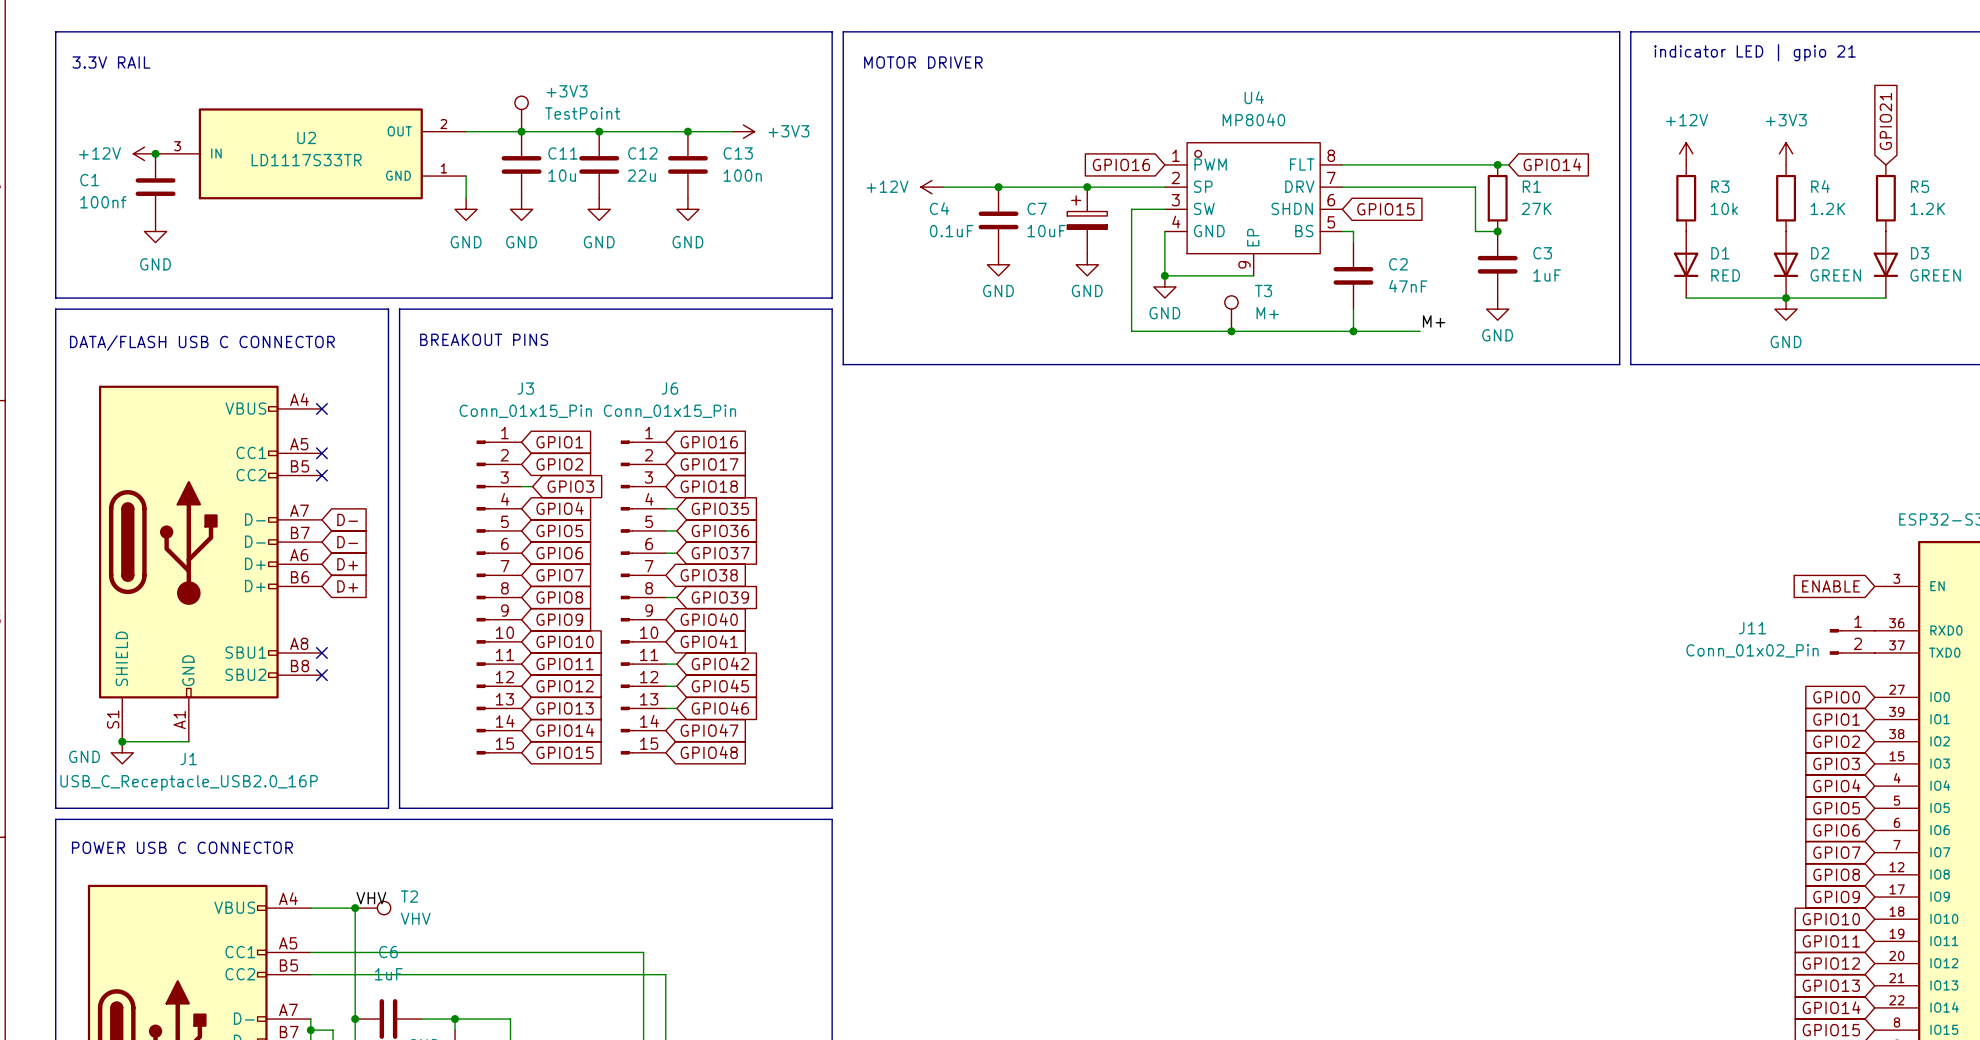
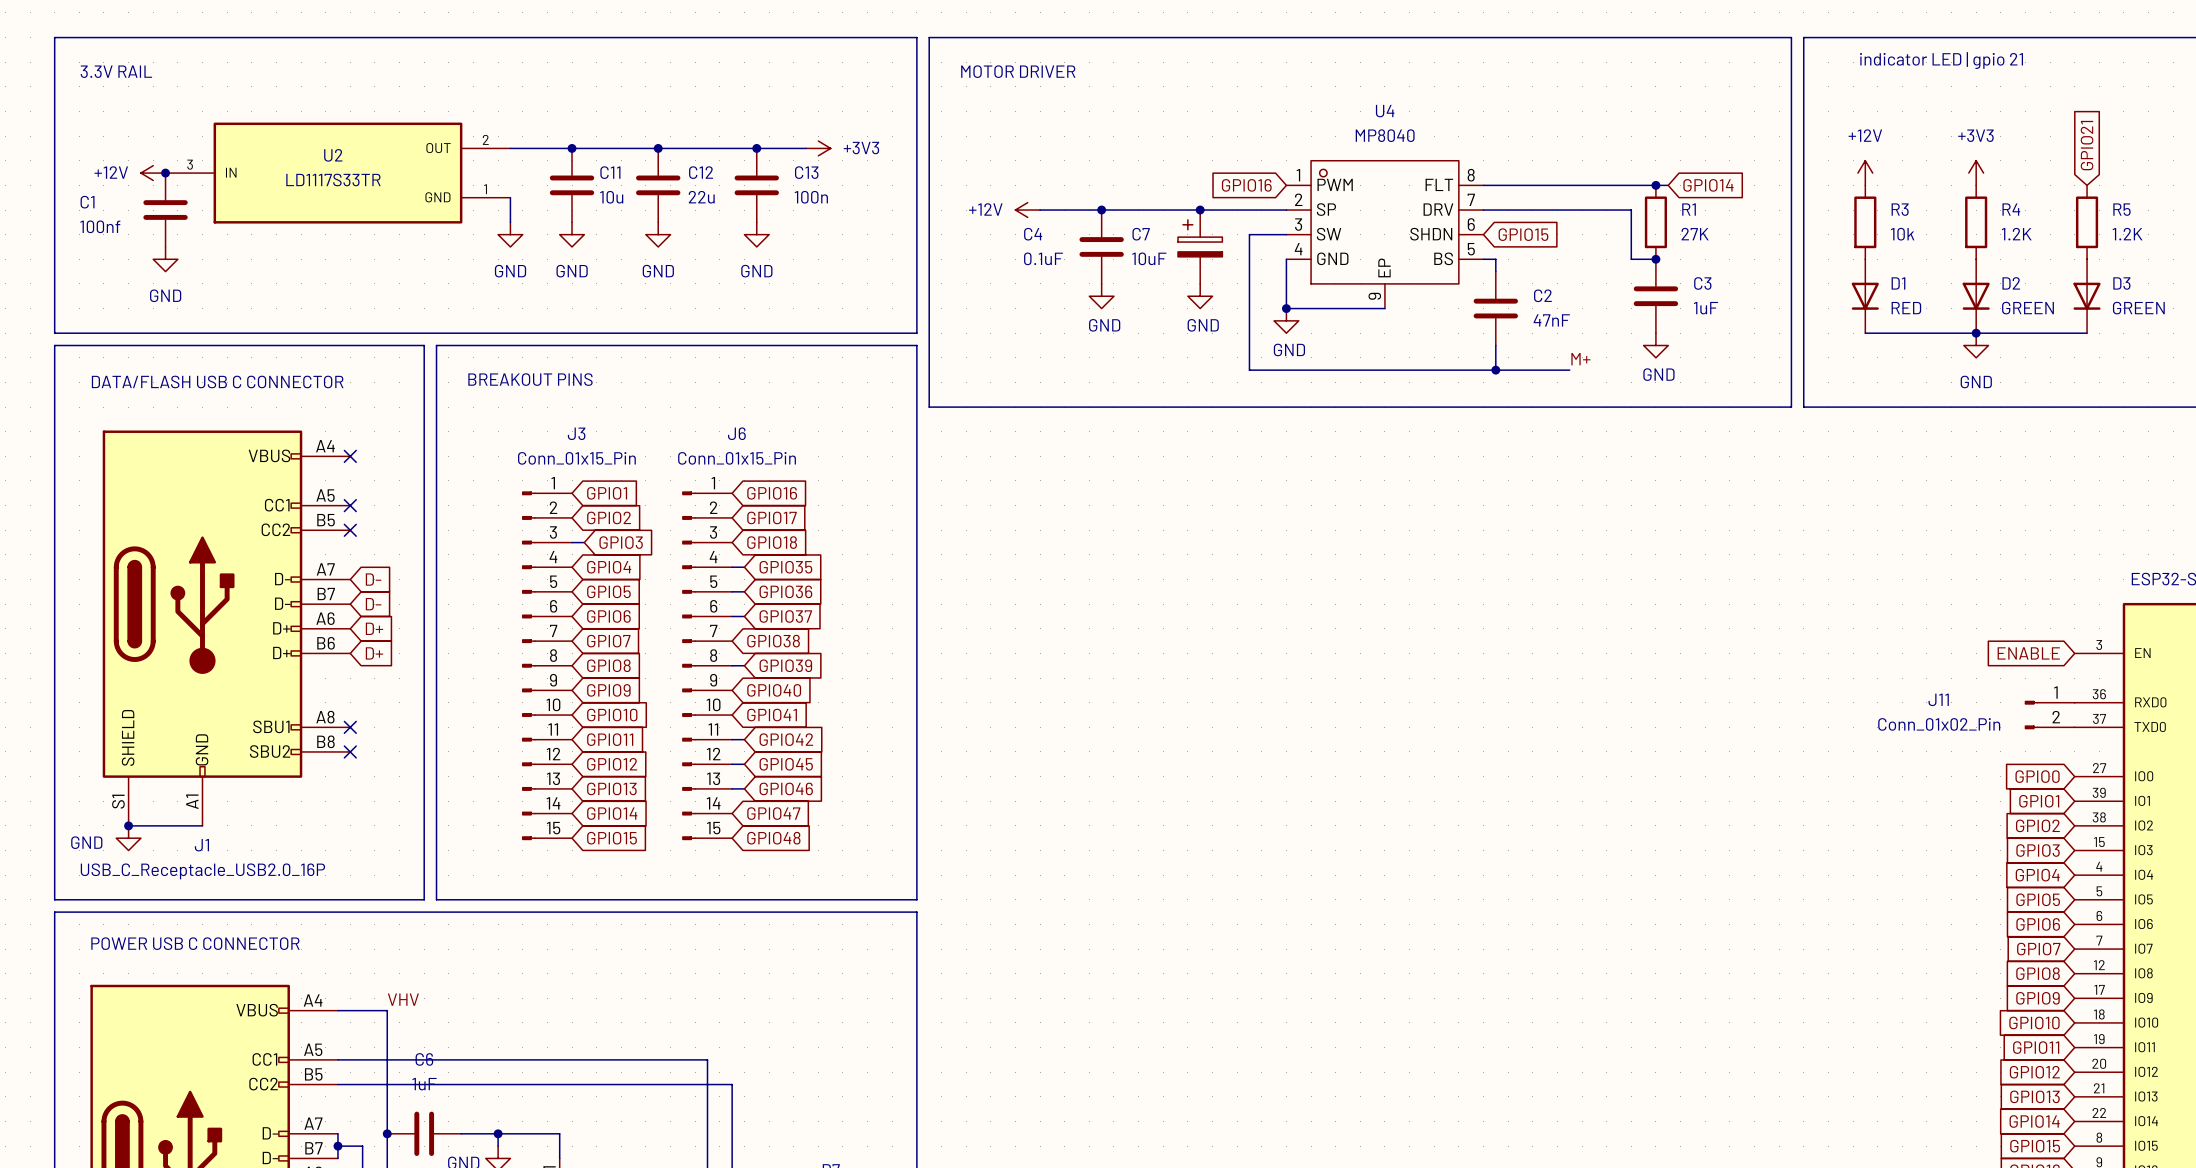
+3V3: TestPoint (521, 113) -> none
T3: M+ (1231, 313) -> none
junction: (1231, 331) -> none
junction: (355, 908) -> none
T2: VHV (372, 908) -> none

